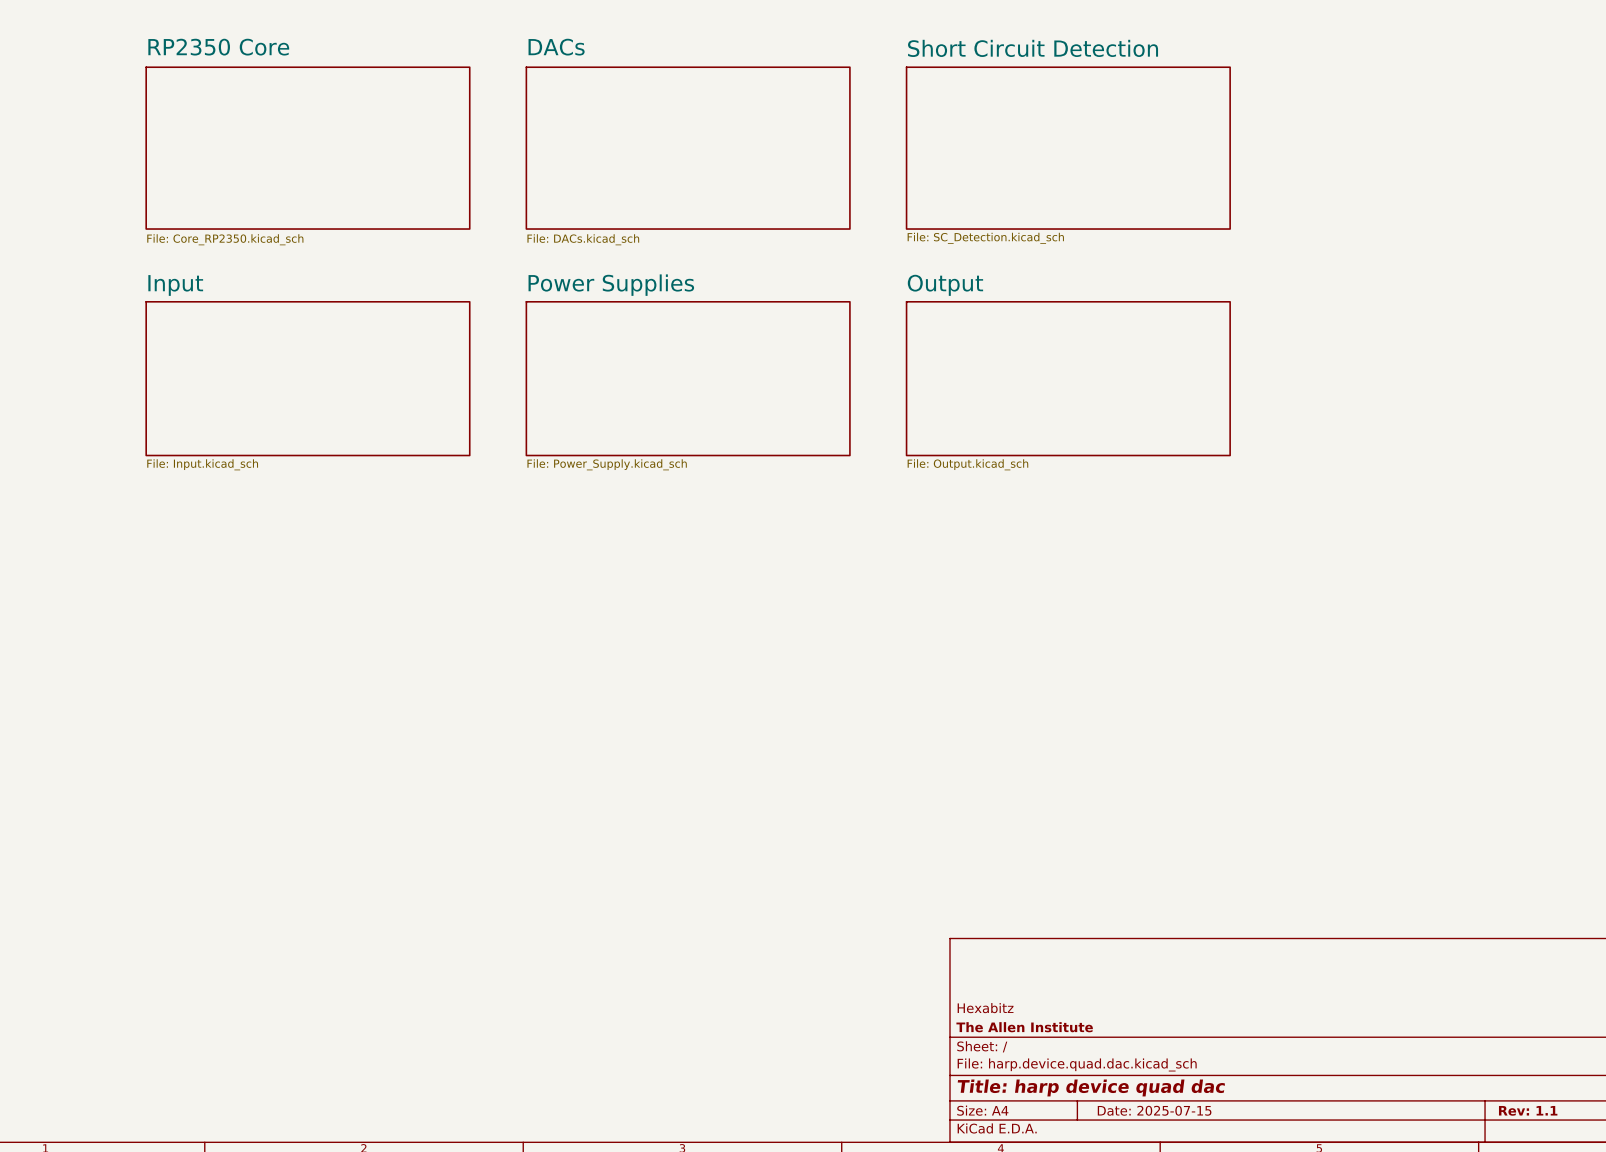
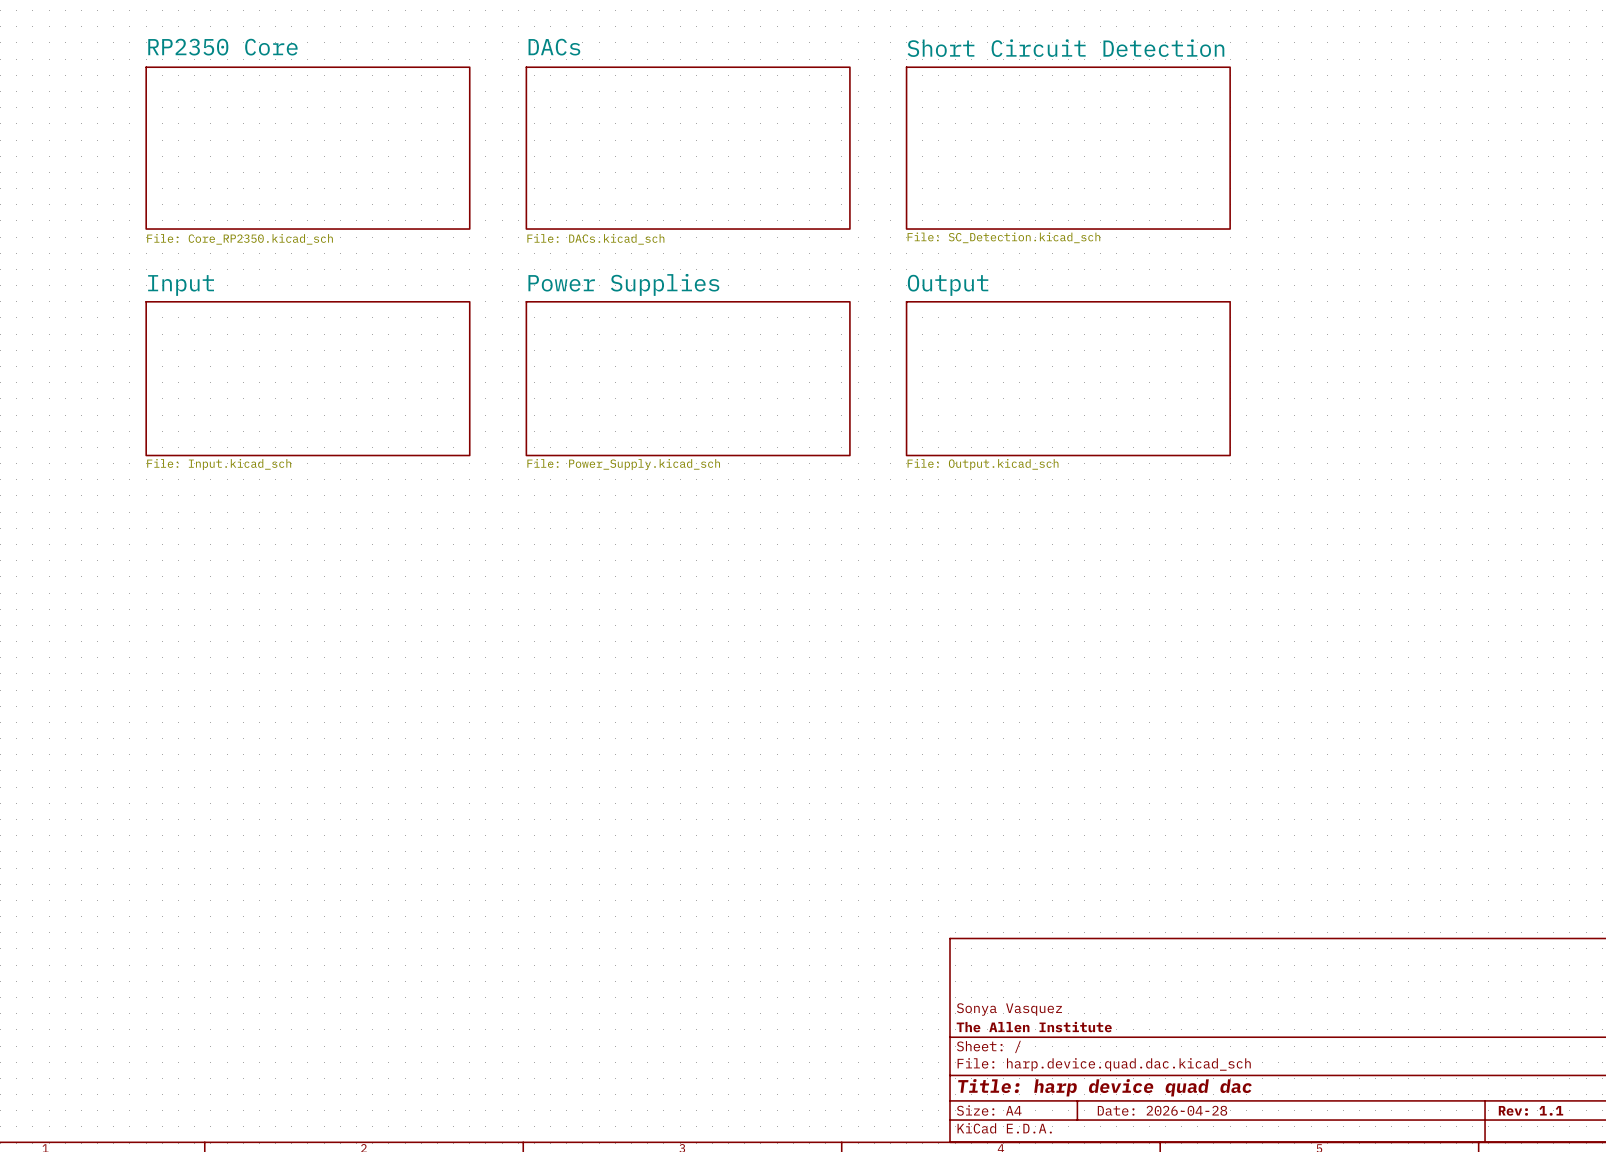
title block: Hexabitz (985, 1008) -> Sonya Vasquez (1009, 1009)
title block: Date: 2025-07-15 (1154, 1110) -> Date: 2026-04-28 (1162, 1110)

